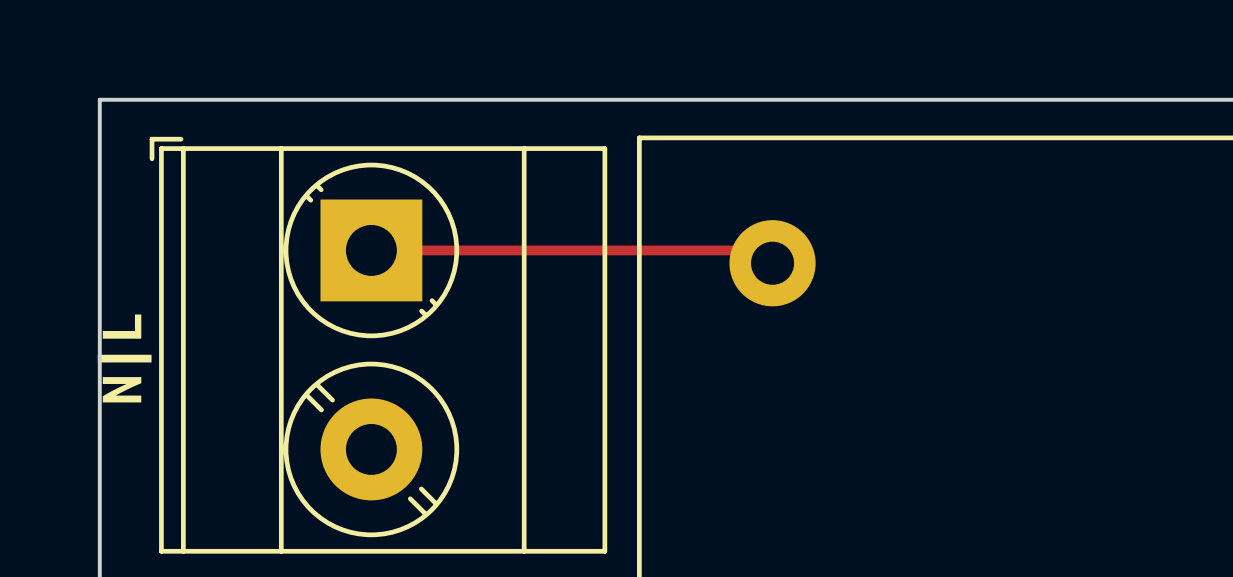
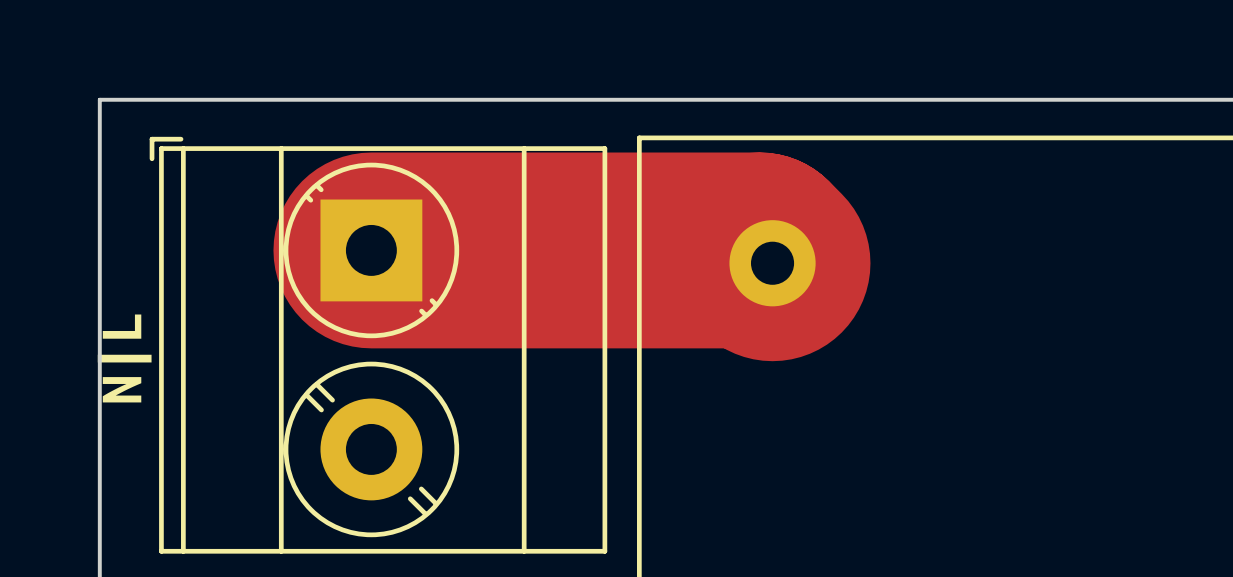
track width: thin (371, 250) (759, 250) (772, 263) -> thick (371, 250) (759, 250) (772, 263)

